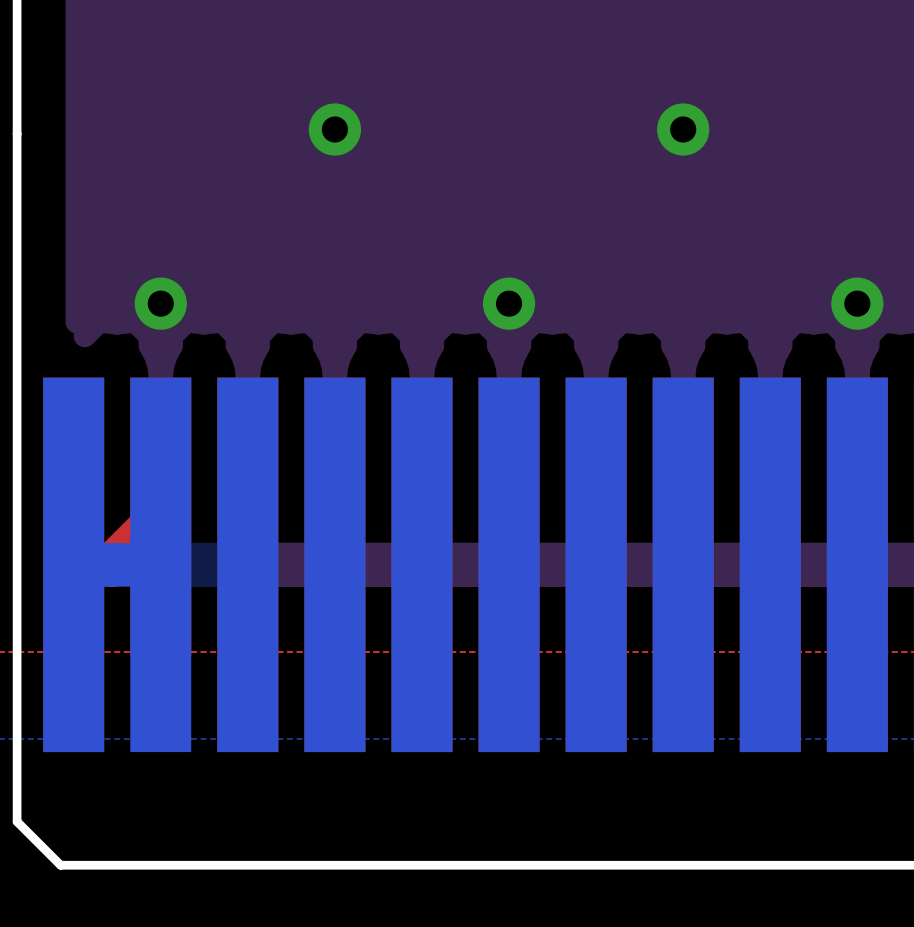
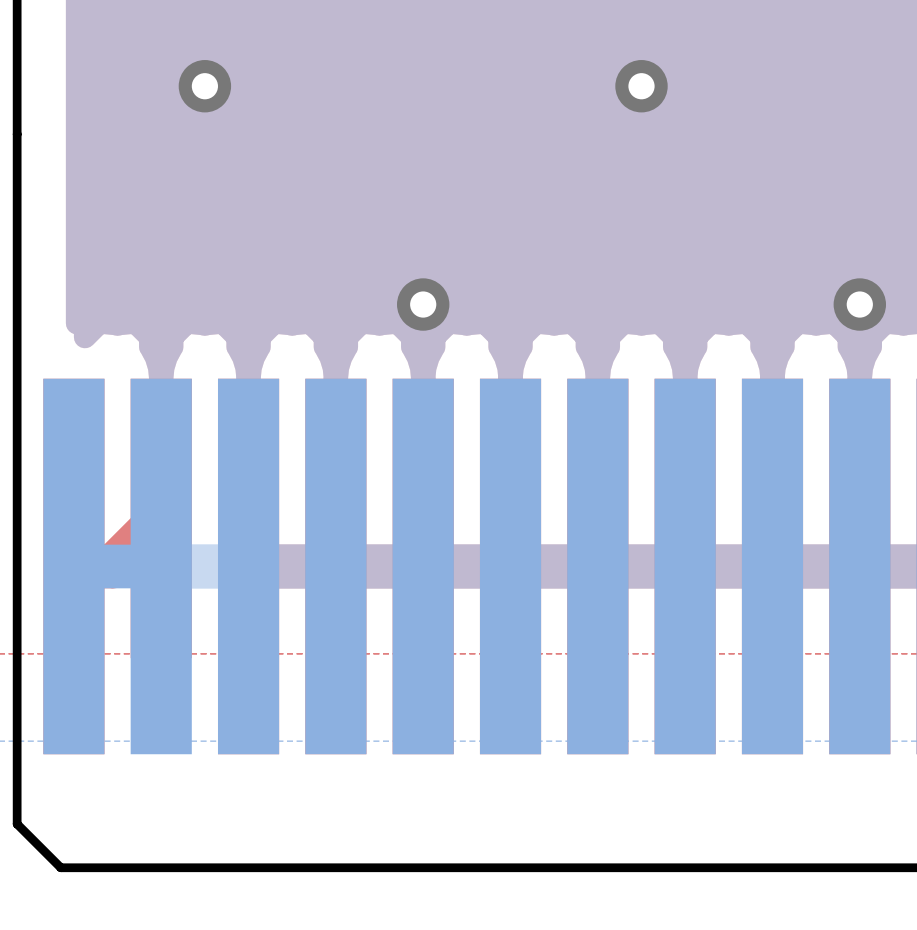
via: none -> (204, 86)
via: (334, 129) -> none
via position: (683, 129) -> (641, 86)
via: (160, 303) -> none
via position: (509, 303) -> (423, 304)

